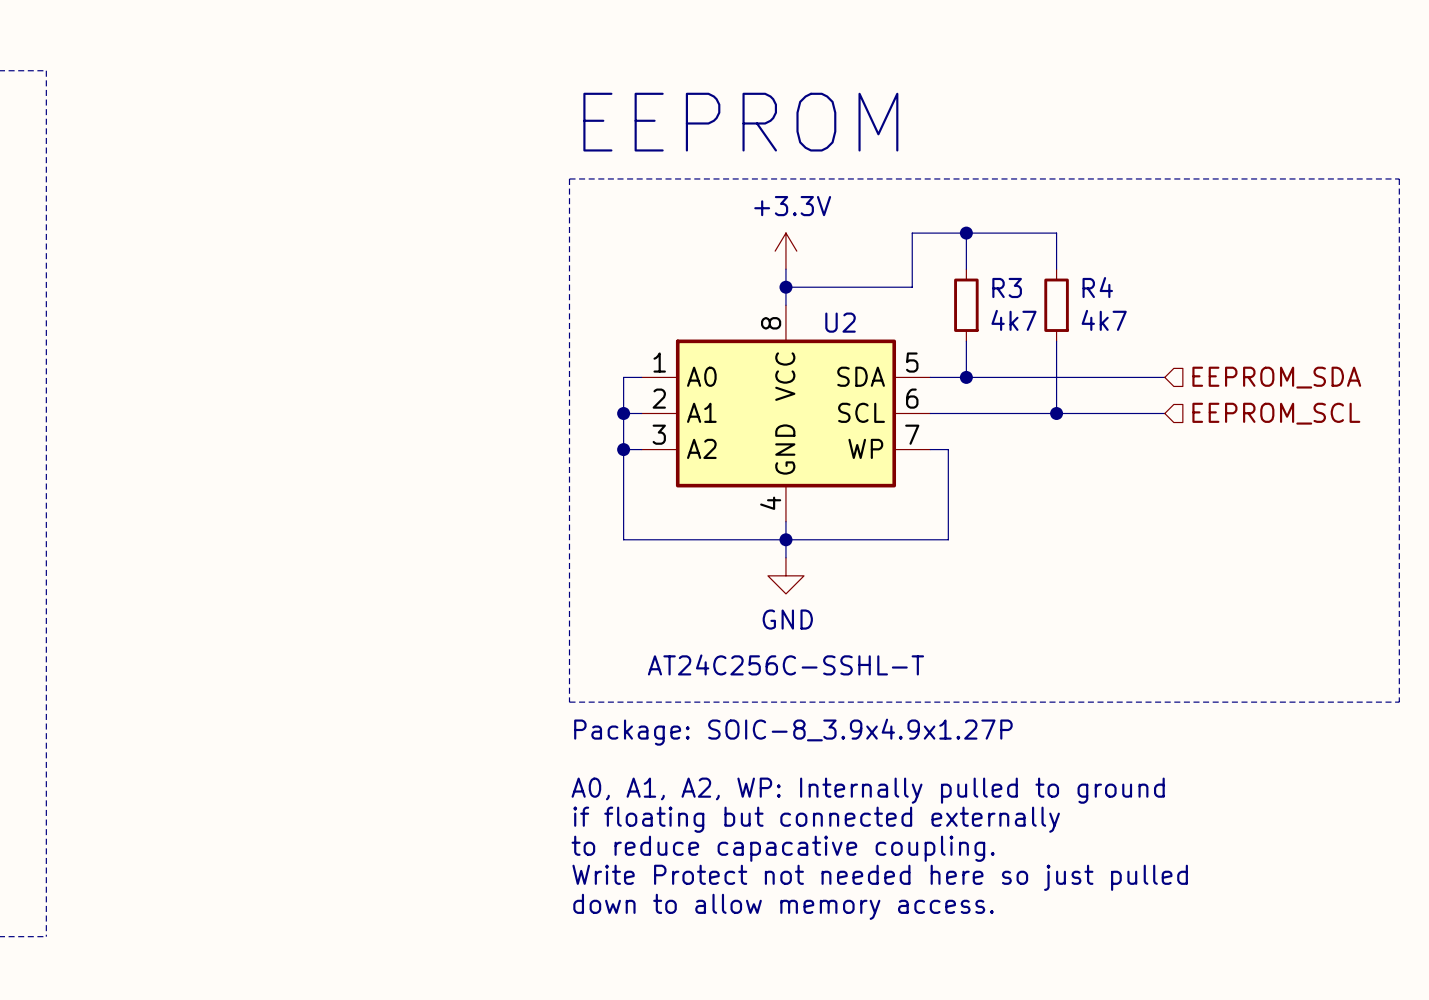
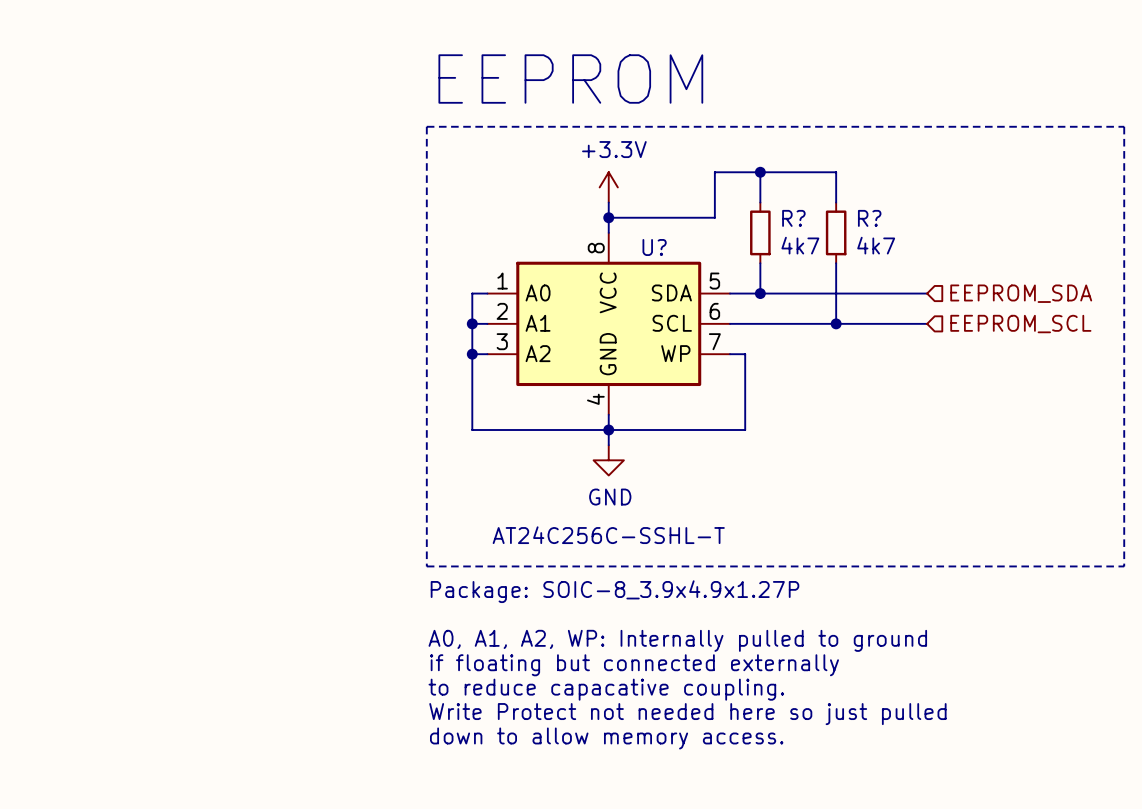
R3 name: R3 (1007, 287) -> R? (793, 218)
R4 name: R4 (1097, 287) -> R? (869, 218)
U2 name: U2 (840, 322) -> U? (654, 247)

